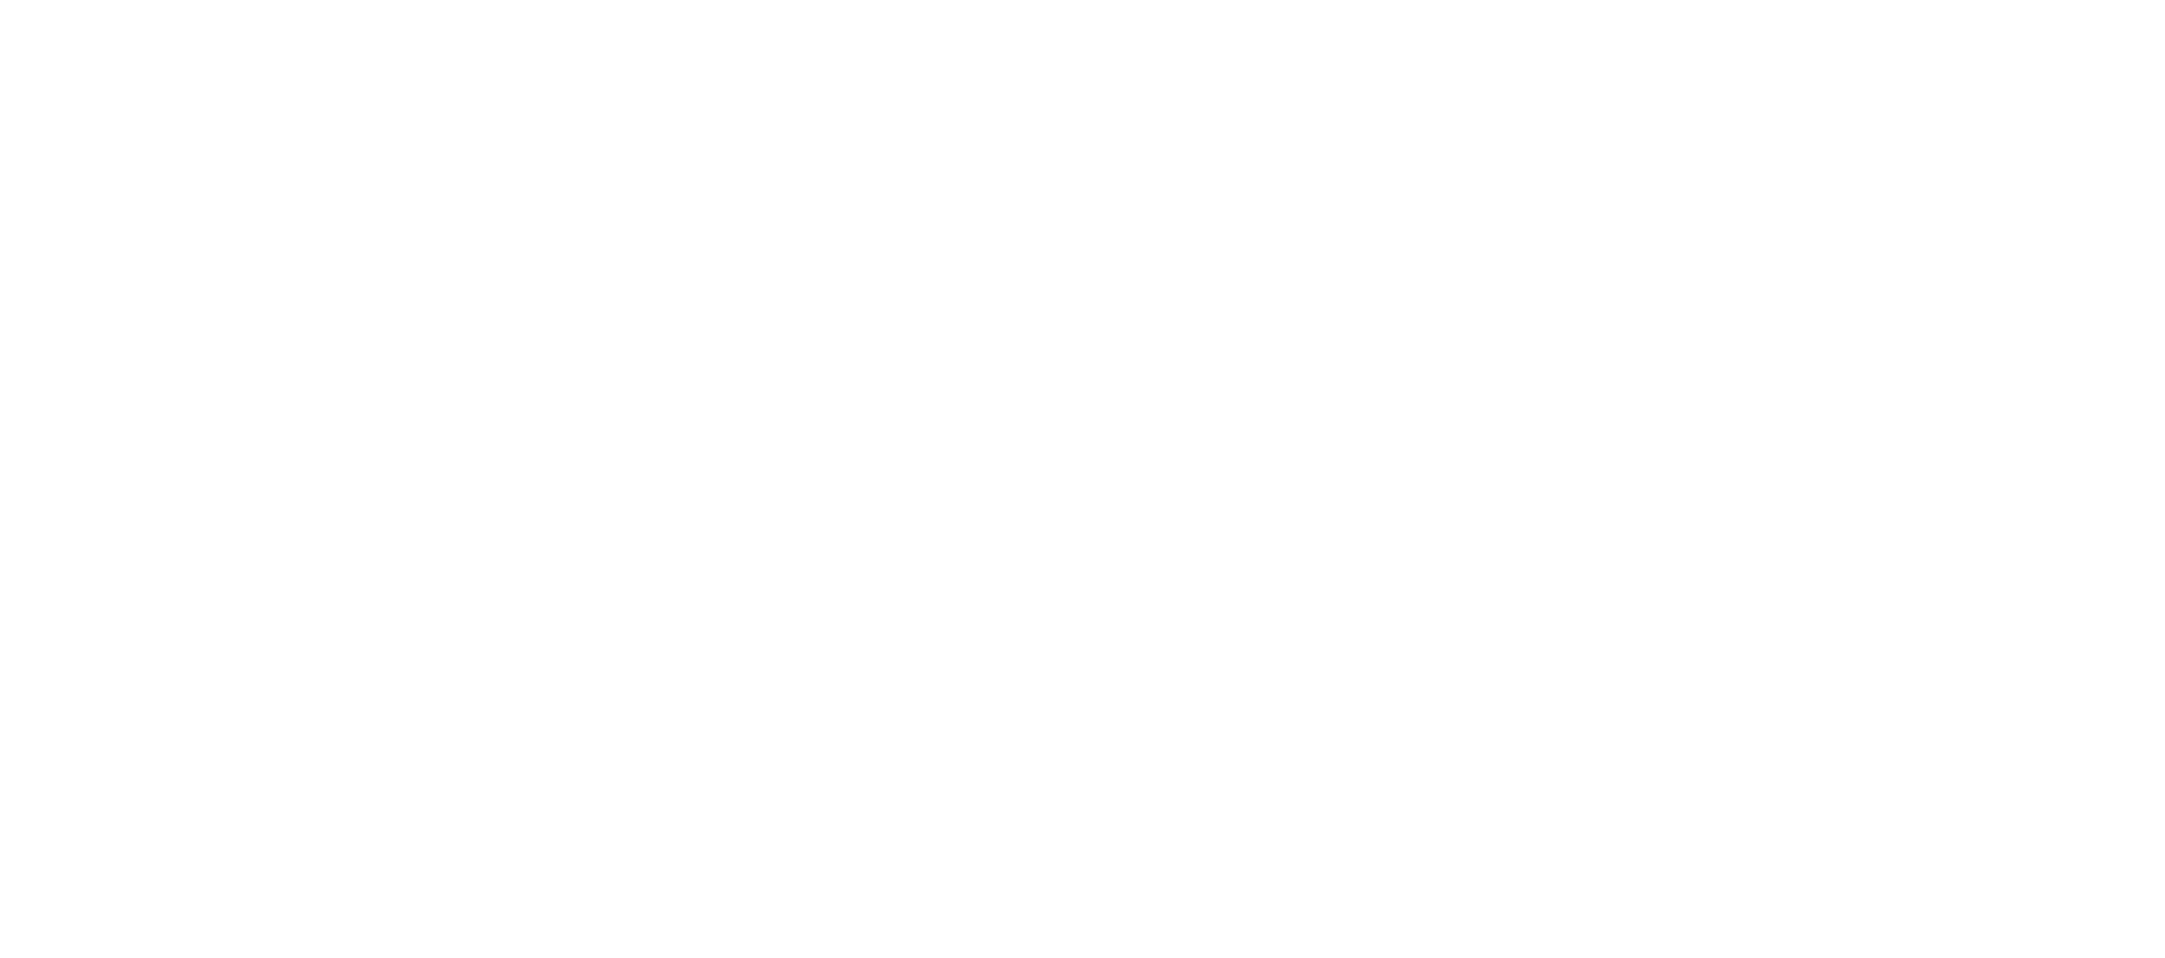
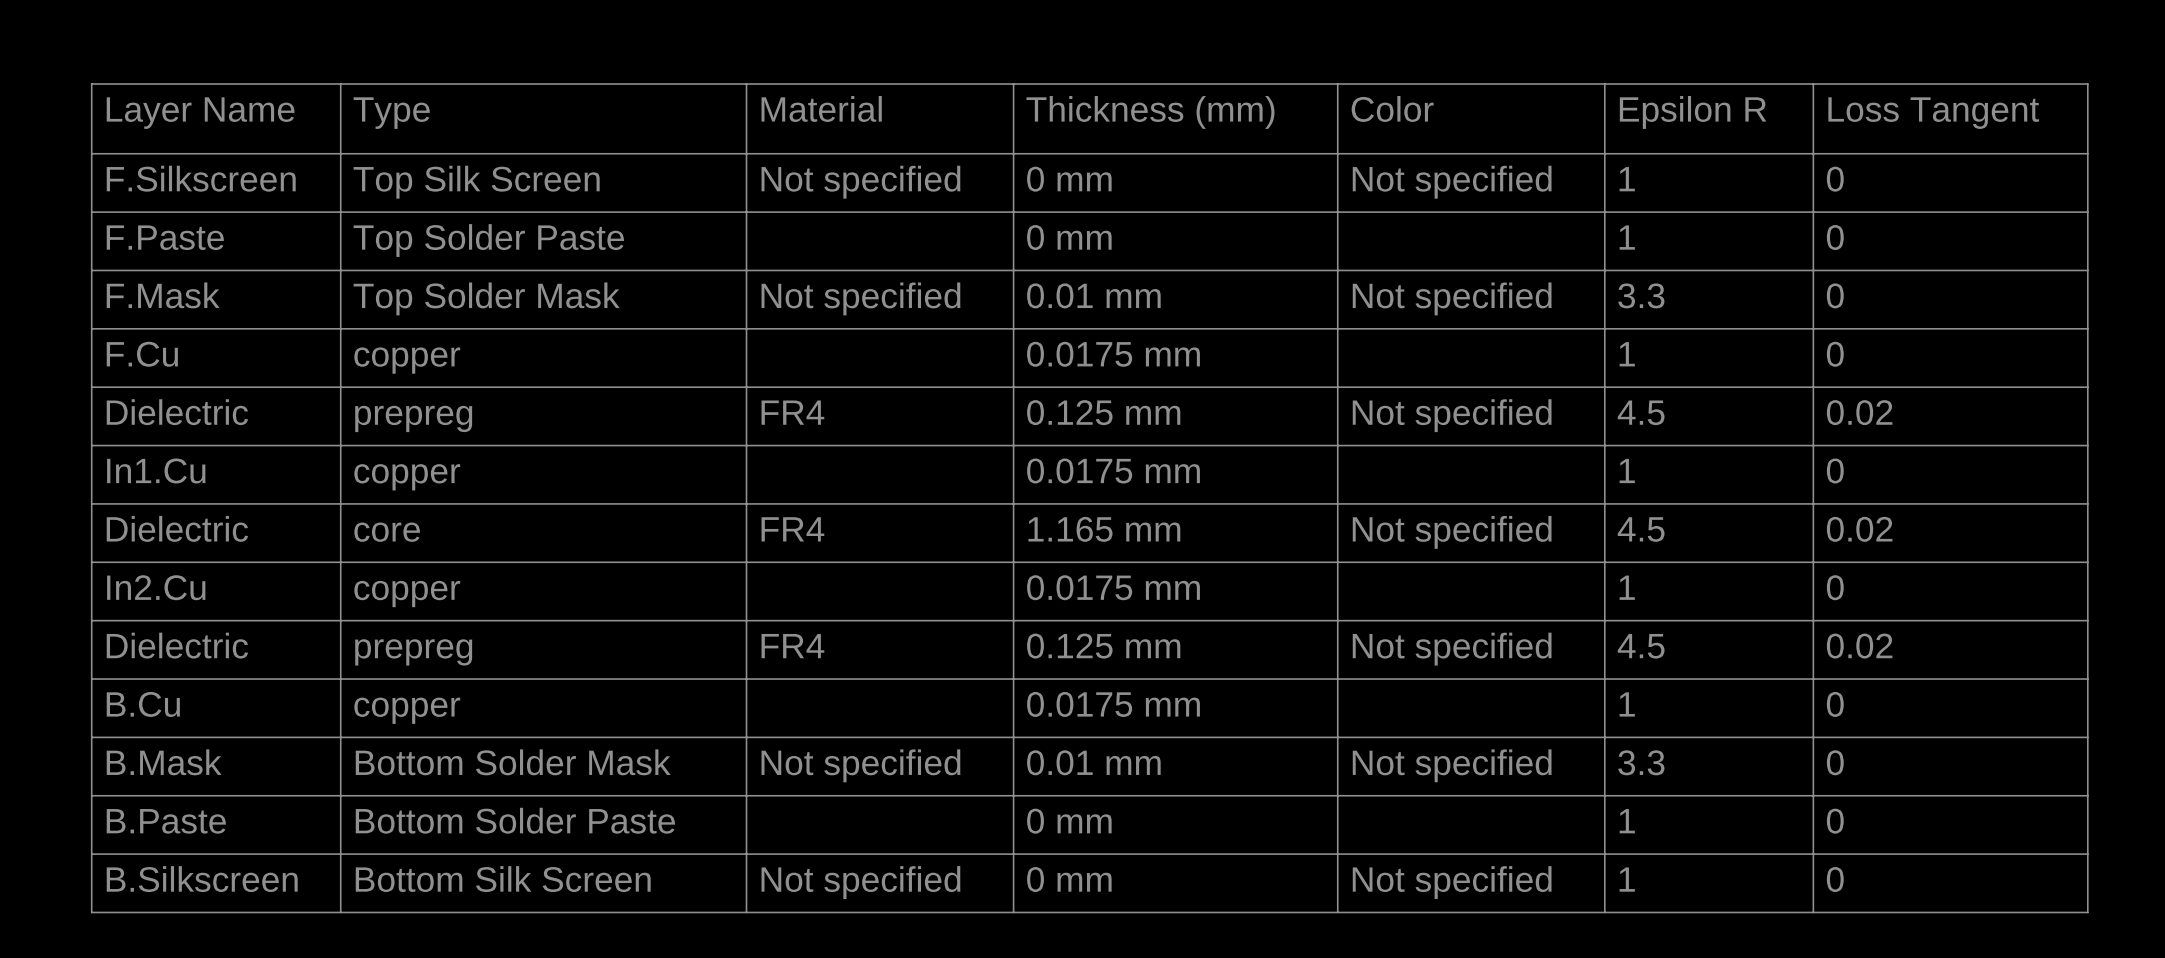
line: none -> (91, 84) (91, 912) (2087, 912) (2087, 84) (91, 84)
line: none -> (340, 84) (340, 912)
line: none -> (746, 84) (746, 912)
line: none -> (1013, 84) (1013, 912)
line: none -> (1337, 84) (1337, 912)
line: none -> (1604, 84) (1604, 912)
line: none -> (1813, 84) (1813, 912)
text: none -> Material (821, 108)
text: none -> Color (1392, 108)
text: none -> Thickness (mm) (1150, 112)
text: none -> Layer Name (200, 113)
text: none -> Type (391, 113)
text: none -> Epsilon R (1693, 112)
text: none -> Loss Tangent (1933, 113)
line: none -> (91, 153) (2087, 153)
text: none -> F.Silkscreen (201, 178)
text: none -> 0 mm (1069, 179)
text: none -> 1 (1627, 179)
text: none -> 0 (1835, 179)
text: none -> Top Silk Screen (476, 182)
text: none -> Not specified (860, 182)
text: none -> Not specified (1452, 182)
line: none -> (91, 212) (2087, 212)
text: none -> F.Paste (165, 237)
text: none -> 0 mm (1069, 237)
text: none -> 1 (1627, 237)
text: none -> 0 (1835, 237)
text: none -> Top Solder Paste (488, 240)
line: none -> (91, 270) (2087, 270)
text: none -> 0.01 mm (1093, 295)
text: none -> 0 (1835, 295)
text: none -> F.Mask (163, 295)
text: none -> 3.3 (1641, 295)
text: none -> Top Solder Mask (486, 298)
text: none -> Not specified (860, 298)
text: none -> Not specified (1452, 298)
line: none -> (91, 328) (2087, 328)
text: none -> F.Cu (142, 354)
text: none -> 0.0175 mm (1113, 354)
text: none -> 1 (1627, 354)
text: none -> 0 (1835, 354)
text: none -> copper (407, 360)
line: none -> (91, 387) (2087, 387)
text: none -> Dielectric (177, 412)
text: none -> FR4 (792, 412)
text: none -> 0.125 mm (1103, 412)
text: none -> 4.5 (1641, 412)
text: none -> 0.02 (1859, 412)
text: none -> Not specified (1452, 415)
text: none -> prepreg (413, 418)
line: none -> (91, 445) (2087, 445)
text: none -> 1 (1627, 470)
text: none -> In1.Cu (156, 470)
text: none -> 0.0175 mm (1113, 470)
text: none -> 0 (1835, 470)
text: none -> copper (407, 477)
line: none -> (91, 503) (2087, 503)
text: none -> Dielectric (177, 528)
text: none -> FR4 (792, 529)
text: none -> 1.165 mm (1104, 529)
text: none -> 4.5 (1641, 529)
text: none -> 0.02 (1859, 529)
text: none -> core (387, 532)
text: none -> Not specified (1452, 532)
line: none -> (91, 562) (2087, 562)
text: none -> In2.Cu (156, 587)
text: none -> 0.0175 mm (1113, 587)
text: none -> 1 (1627, 587)
text: none -> 0 (1835, 587)
text: none -> copper (407, 594)
line: none -> (91, 620) (2087, 620)
text: none -> Dielectric (177, 645)
text: none -> FR4 (792, 646)
text: none -> 0.125 mm (1103, 646)
text: none -> 4.5 (1641, 646)
text: none -> 0.02 (1859, 646)
text: none -> Not specified (1452, 649)
text: none -> prepreg (413, 652)
line: none -> (91, 679) (2087, 679)
text: none -> B.Cu (143, 704)
text: none -> 0.0175 mm (1113, 704)
text: none -> 1 (1627, 704)
text: none -> 0 (1835, 704)
text: none -> copper (407, 710)
line: none -> (91, 737) (2087, 737)
text: none -> B.Mask (164, 762)
text: none -> Bottom Solder Mask (513, 762)
text: none -> 0.01 mm (1093, 762)
text: none -> 3.3 (1641, 762)
text: none -> 0 (1835, 762)
text: none -> Not specified (860, 765)
text: none -> Not specified (1452, 765)
line: none -> (91, 795) (2087, 795)
text: none -> B.Paste (166, 821)
text: none -> Bottom Solder Paste (515, 820)
text: none -> 0 mm (1069, 821)
text: none -> 1 (1627, 821)
text: none -> 0 (1835, 821)
line: none -> (91, 854) (2087, 854)
text: none -> B.Silkscreen (202, 879)
text: none -> Bottom Silk Screen (503, 879)
text: none -> 0 mm (1069, 879)
text: none -> 1 (1627, 879)
text: none -> 0 (1835, 879)
text: none -> Not specified (860, 882)
text: none -> Not specified (1452, 882)

